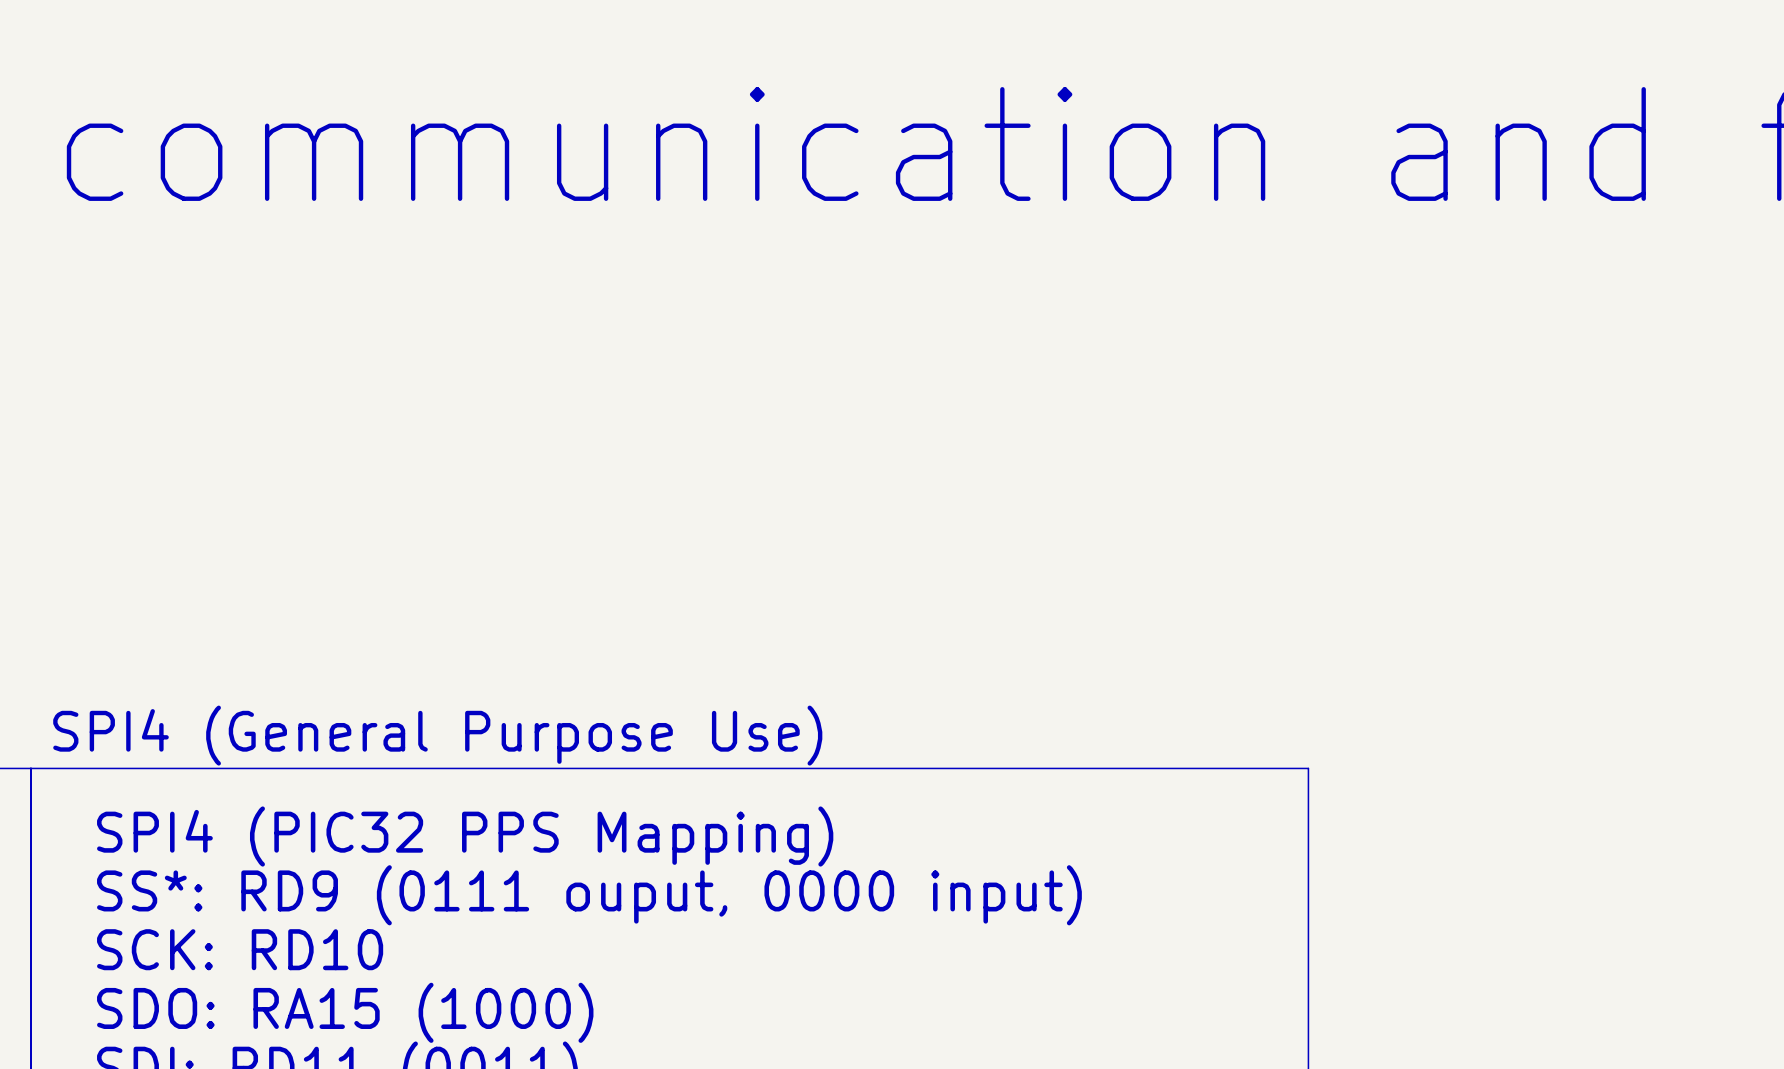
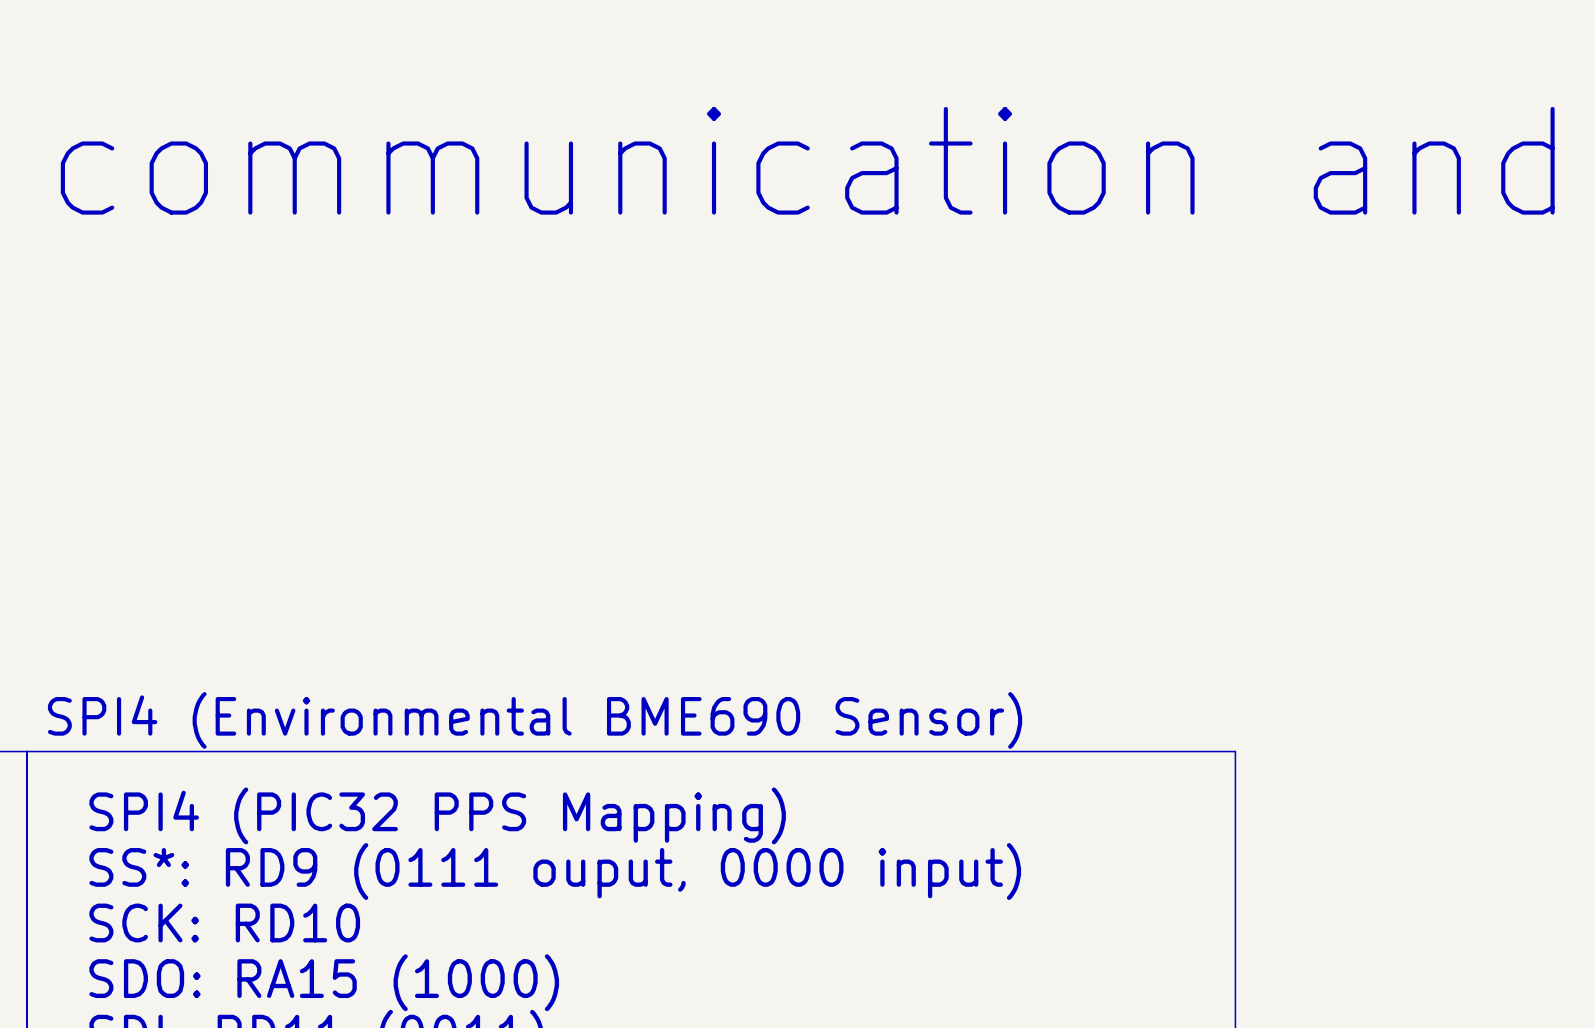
text: SPI4 (General Purpose Use) (437, 735) -> SPI4 (Environmental BME690 Sensor) (535, 720)

